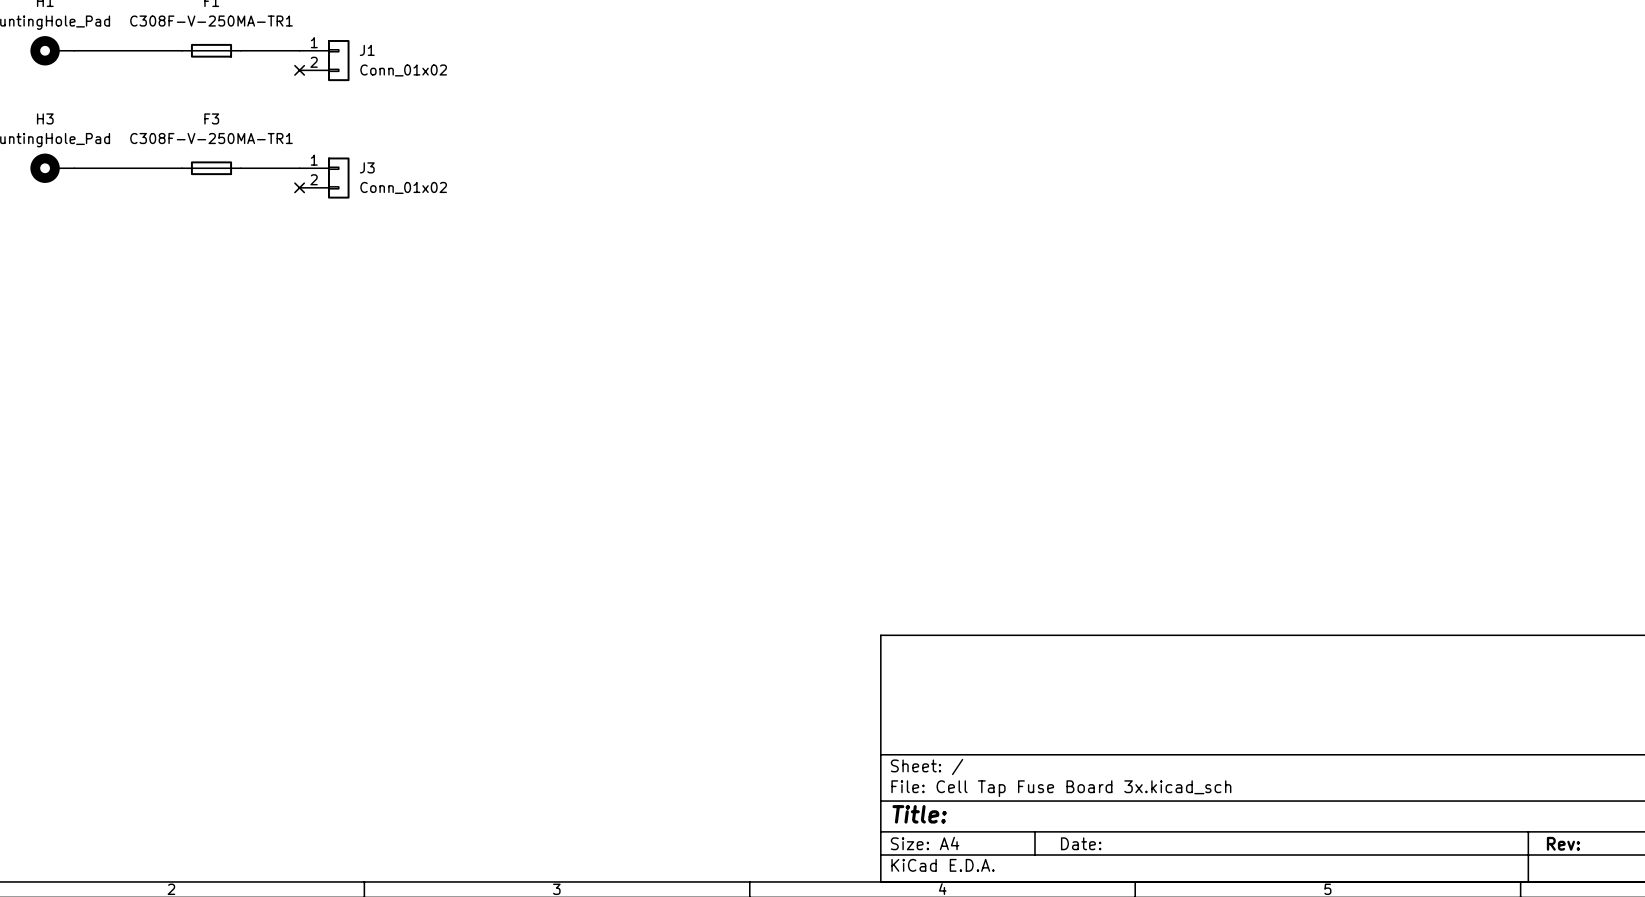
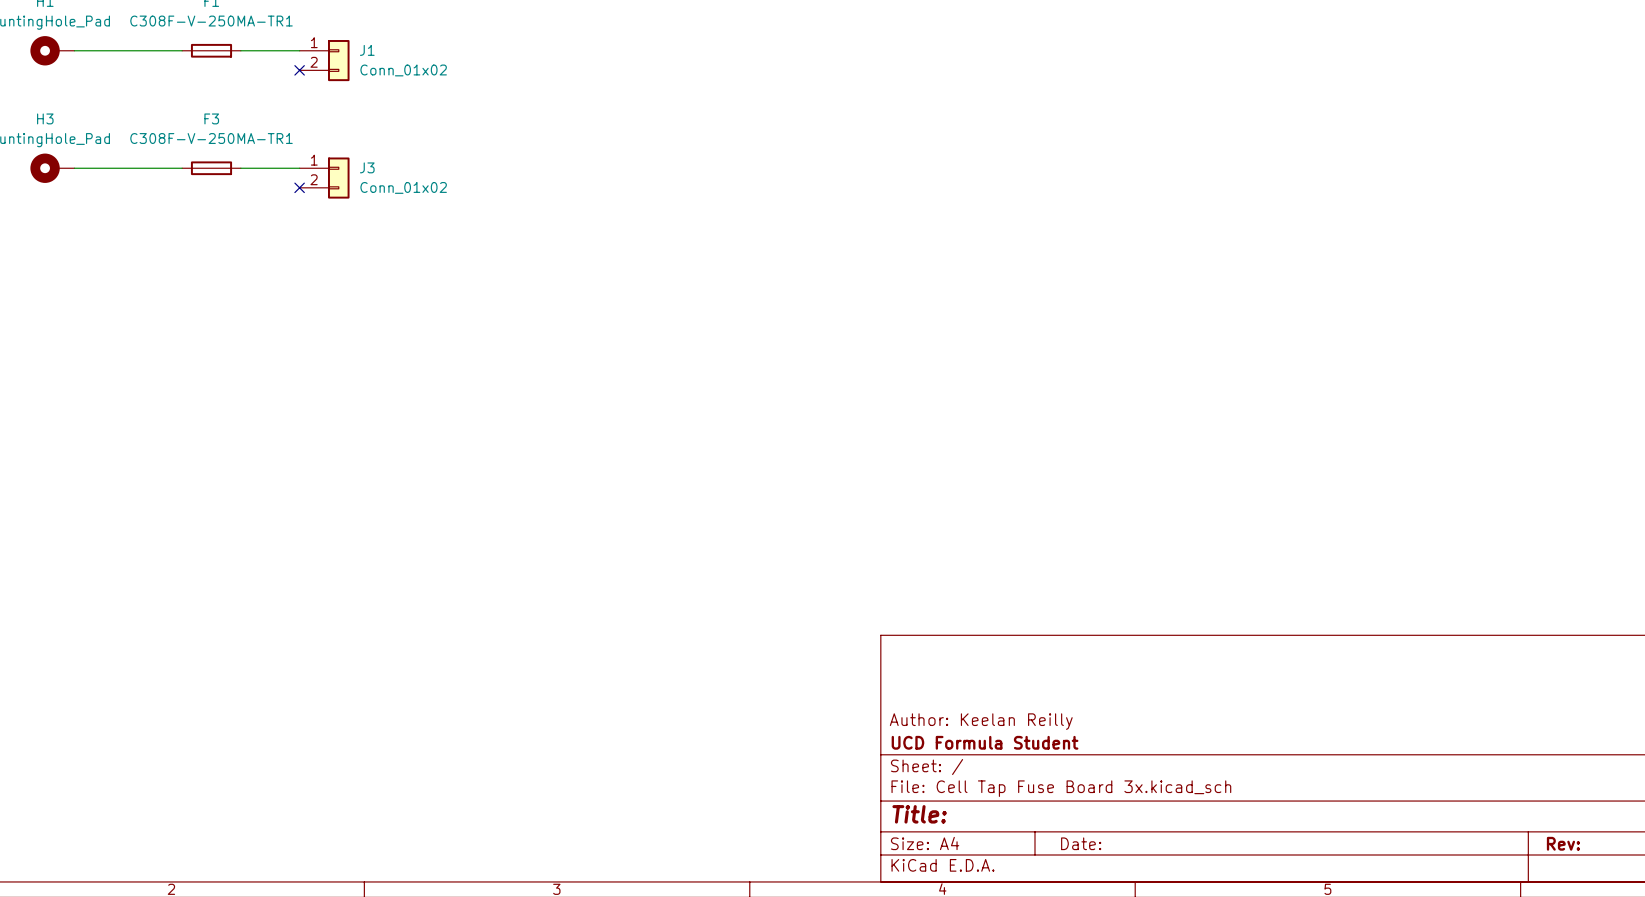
title block: none -> Author: Keelan Reilly (981, 721)
title block: none -> UCD Formula Student (985, 742)

